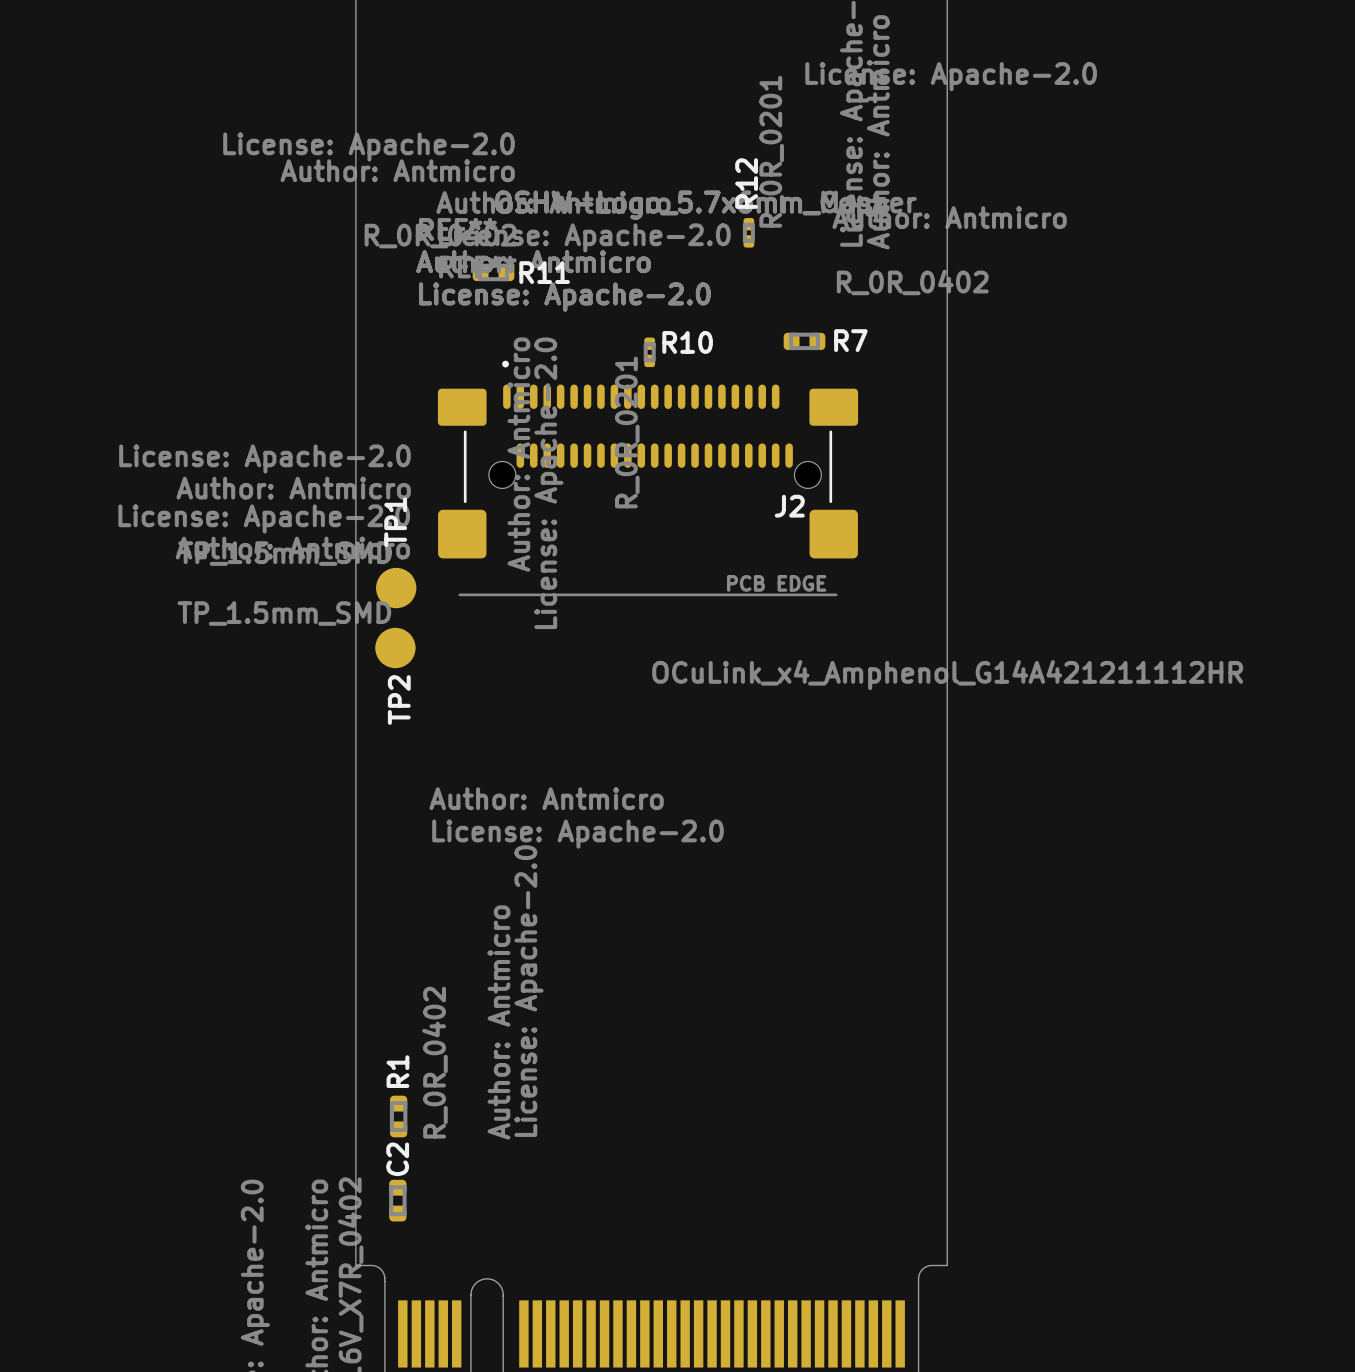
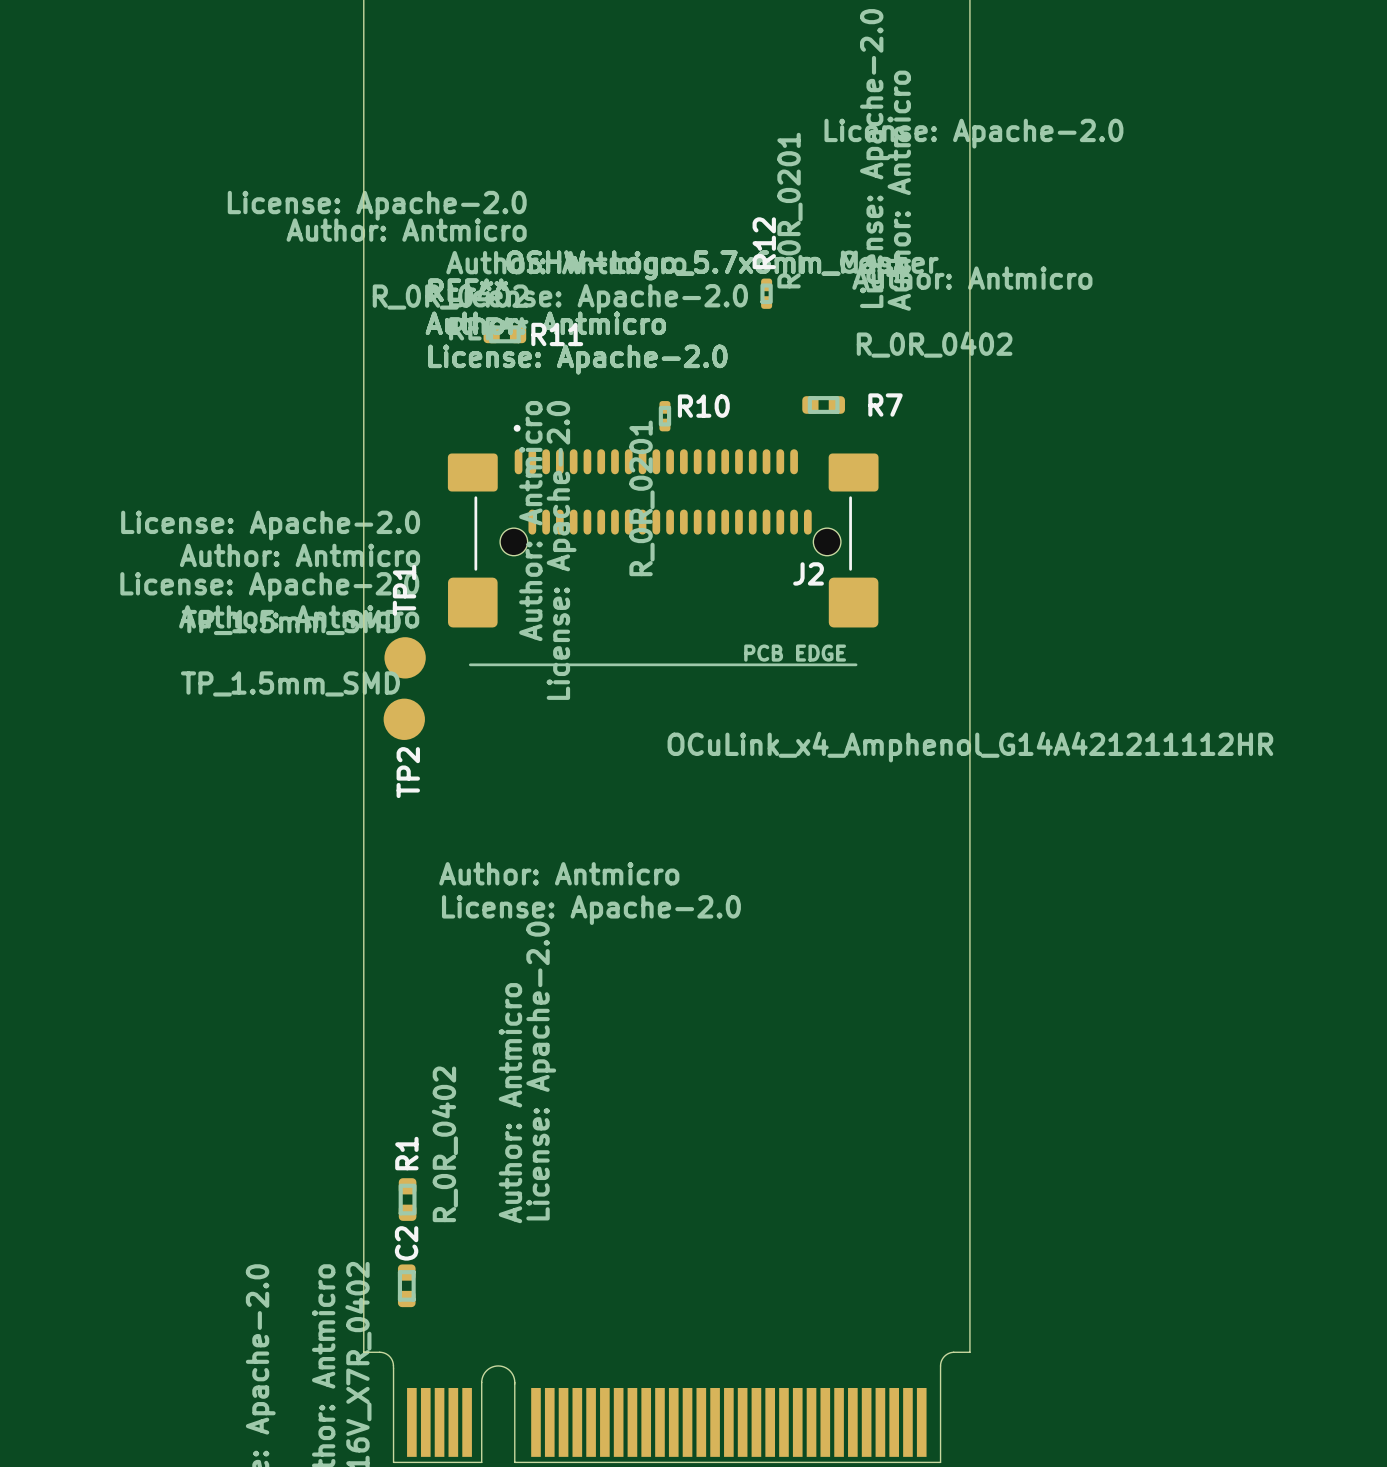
R7 name position: R7 (850, 340) -> R7 (885, 405)

